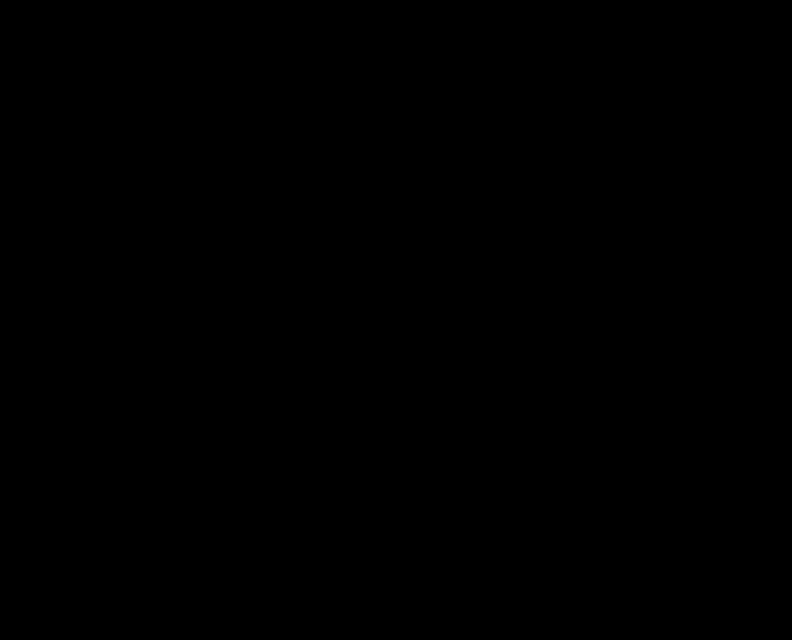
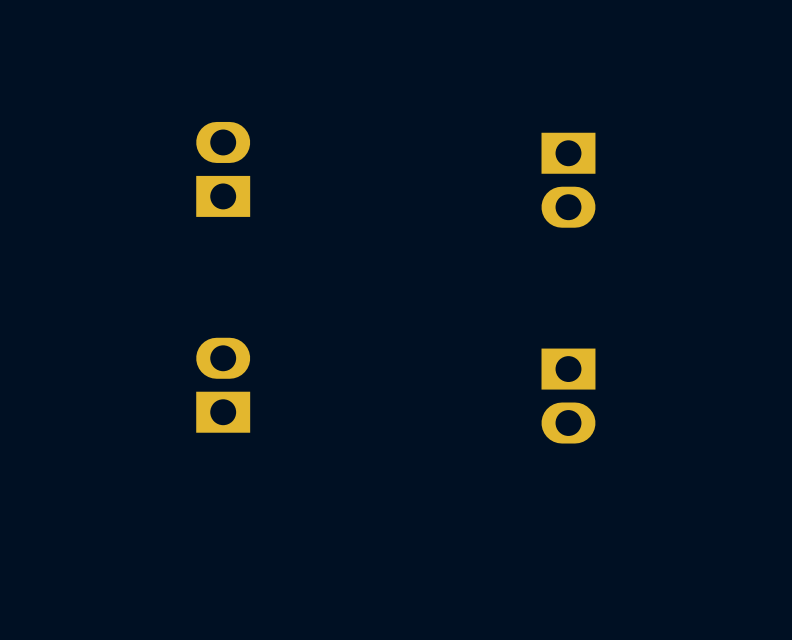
part: none -> (223, 169)
part: none -> (568, 180)
part: none -> (223, 385)
part: none -> (568, 396)

